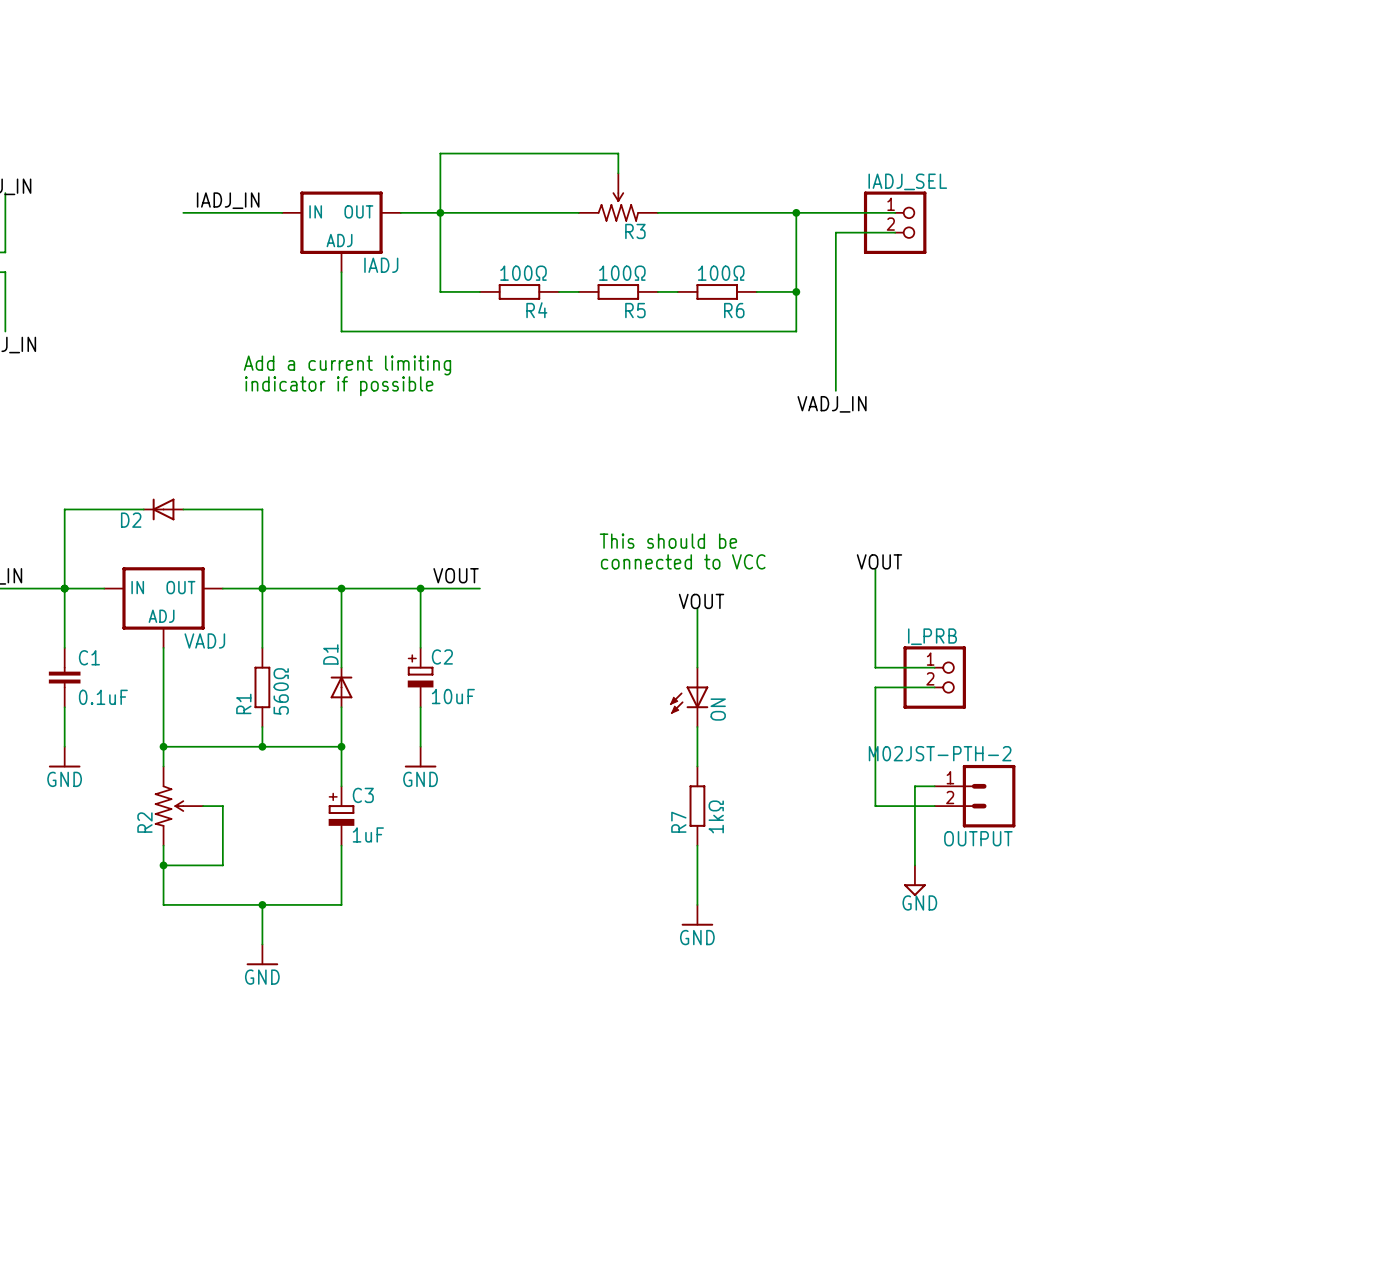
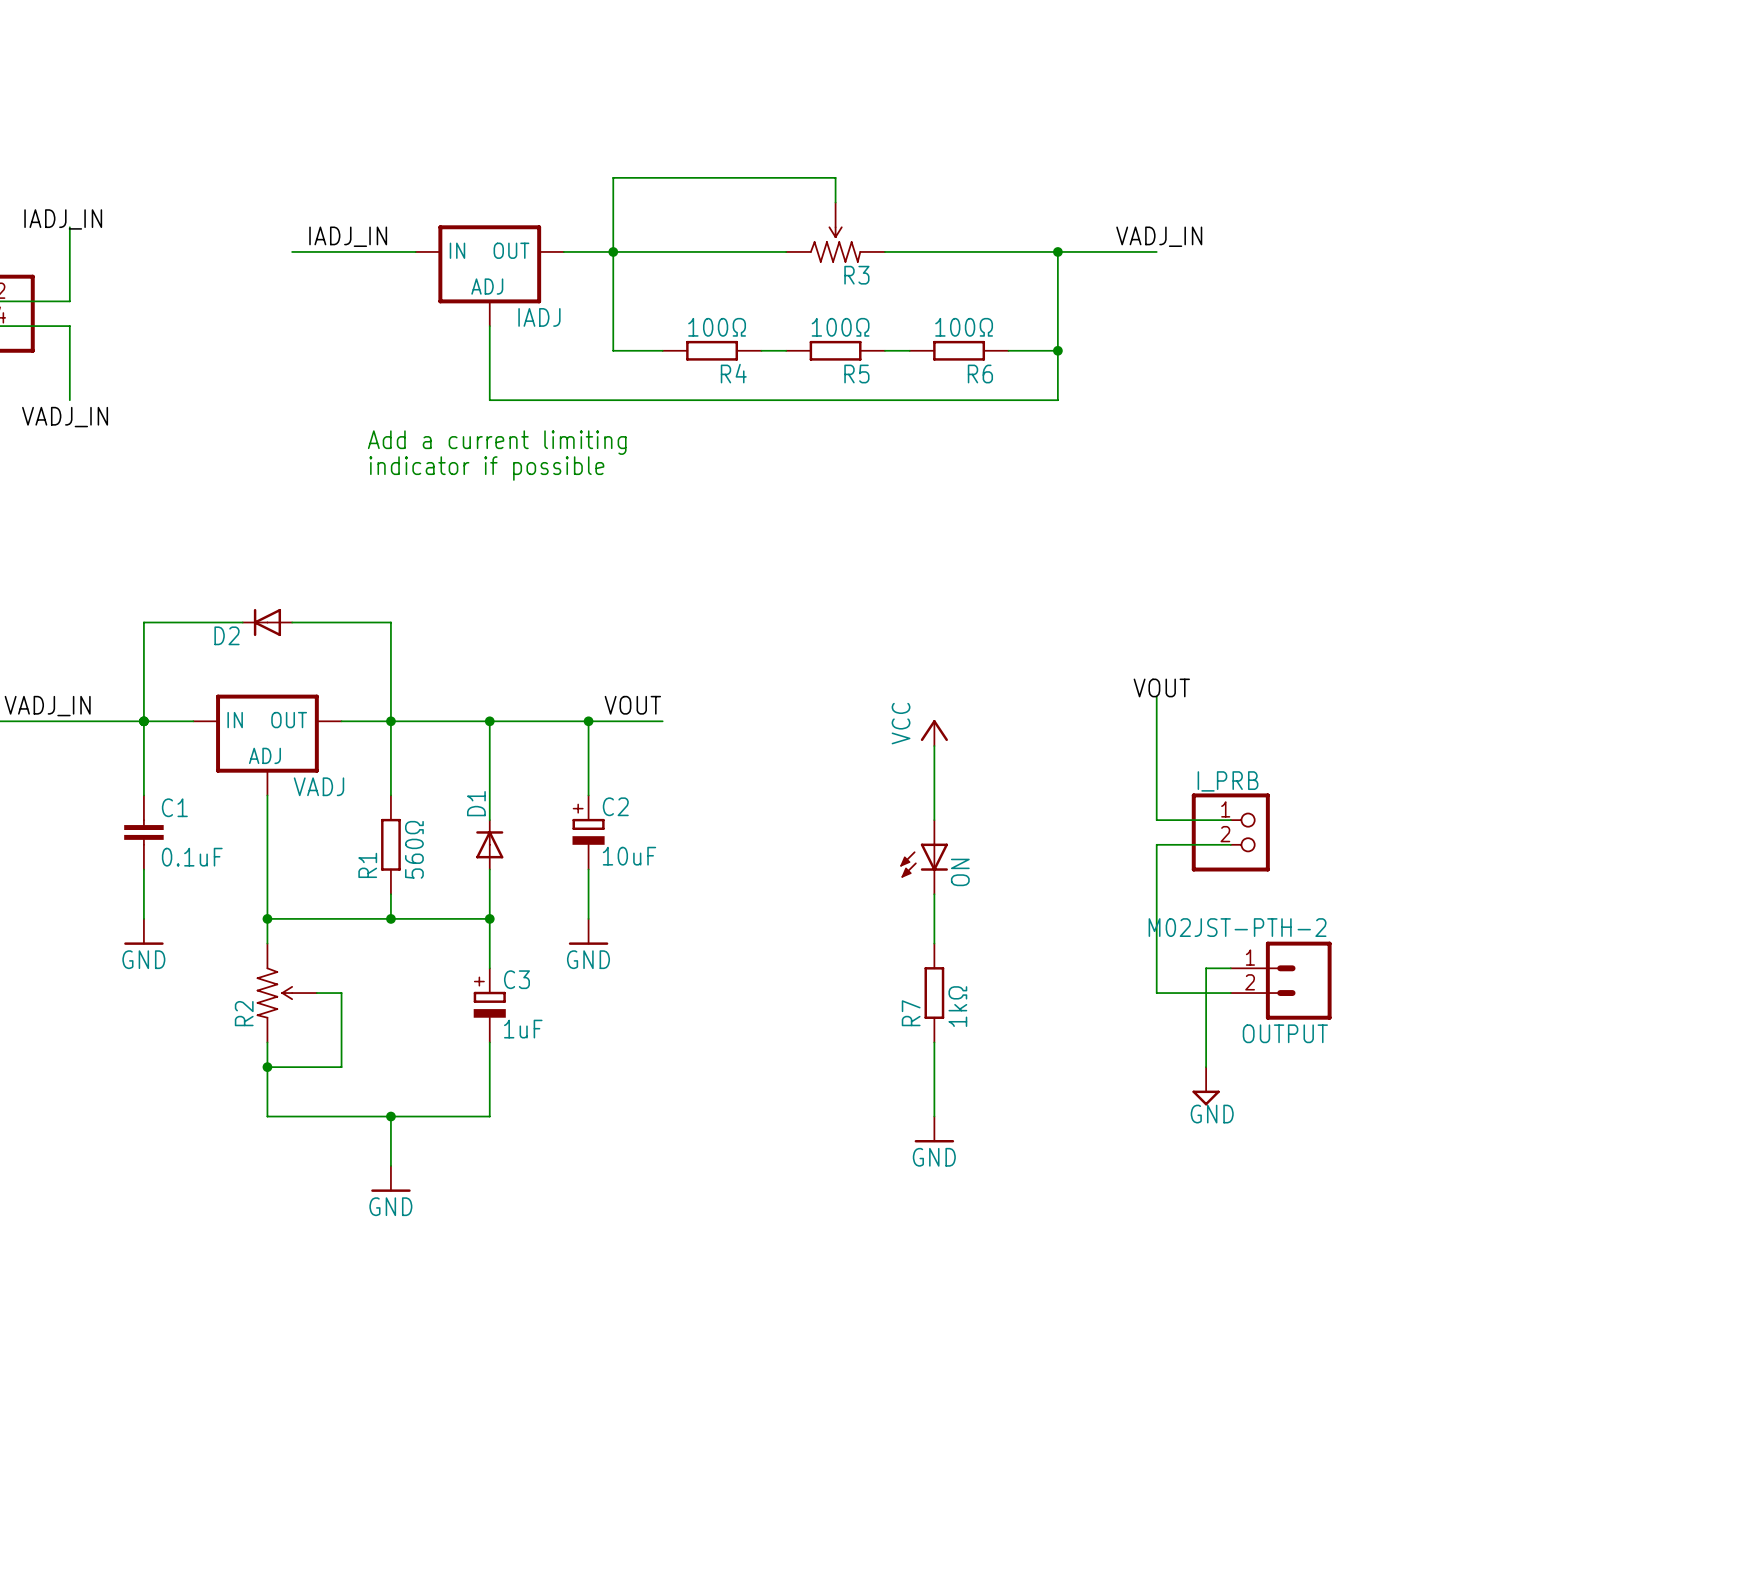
label: none -> VADJ_IN (1159, 236)
wire: (875, 212) (895, 212) -> none
IADJ_SEL: (895, 222) -> none
wire: (895, 232) (835, 232) (835, 390) -> none
label: VADJ_IN (832, 404) -> none
text: This should be (668, 541) -> none
text: connected to VCC (683, 561) -> none
power symbol: none -> VCC (934, 733)
label: VOUT (701, 601) -> none

